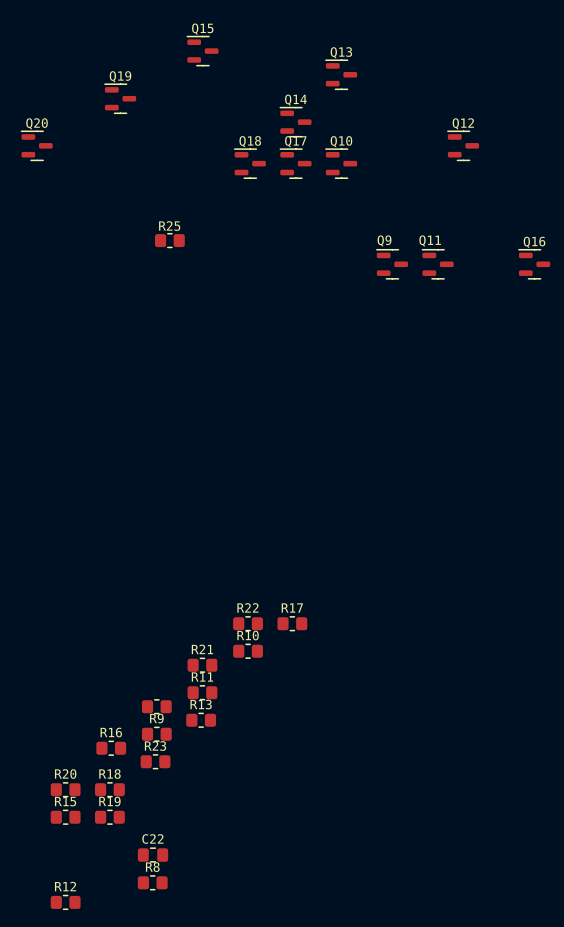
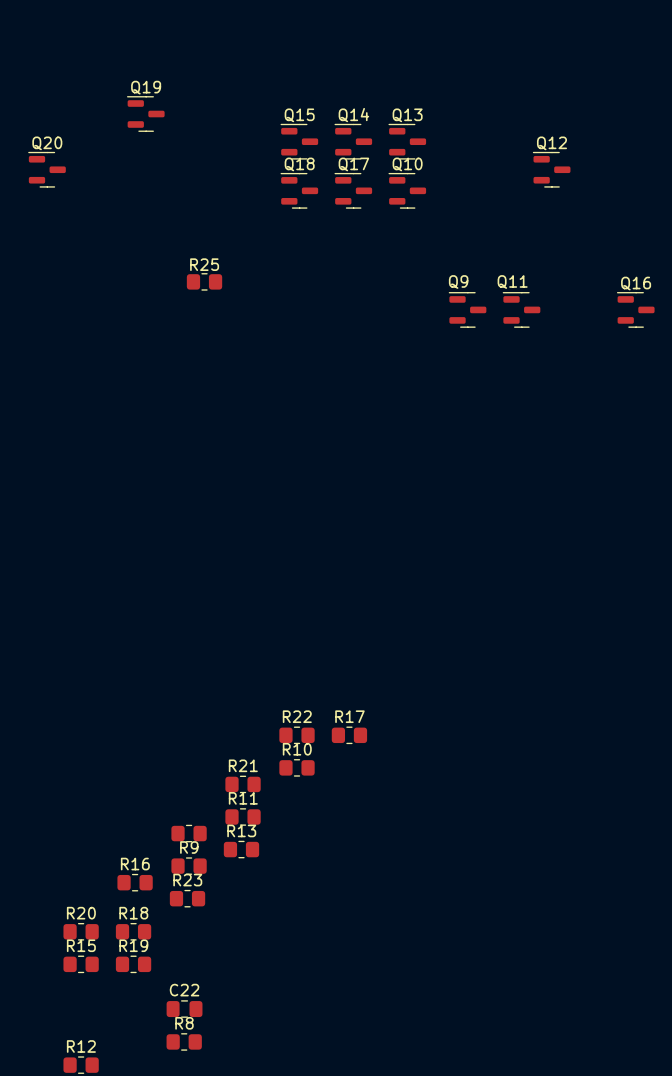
Q15 position: (202, 51) -> (299, 141)
Q13 position: (341, 74) -> (407, 141)

